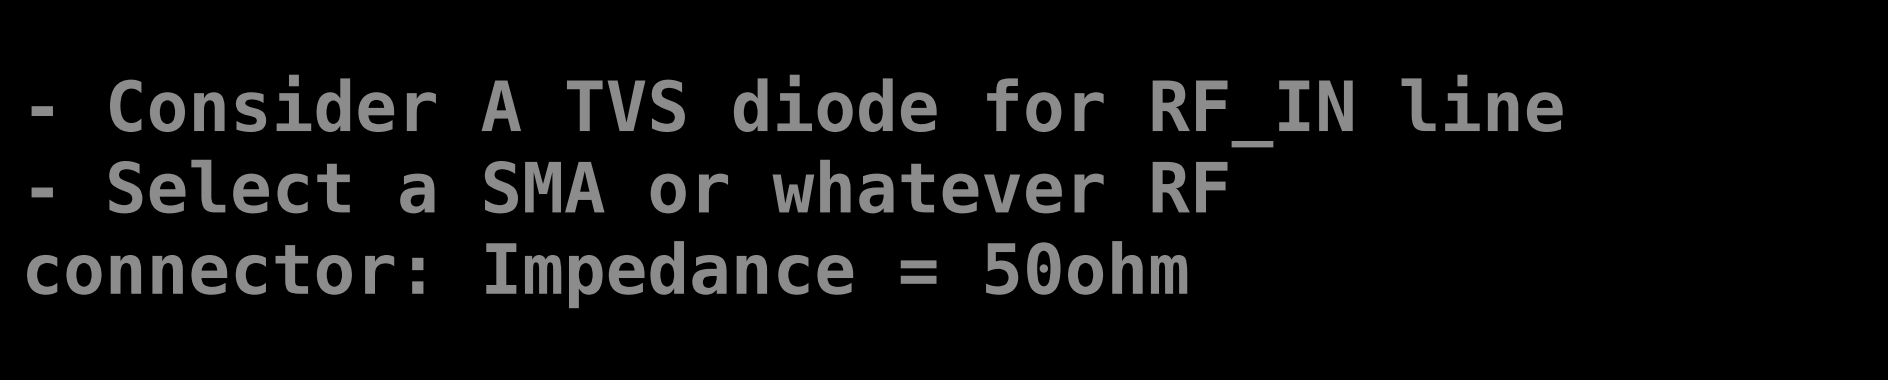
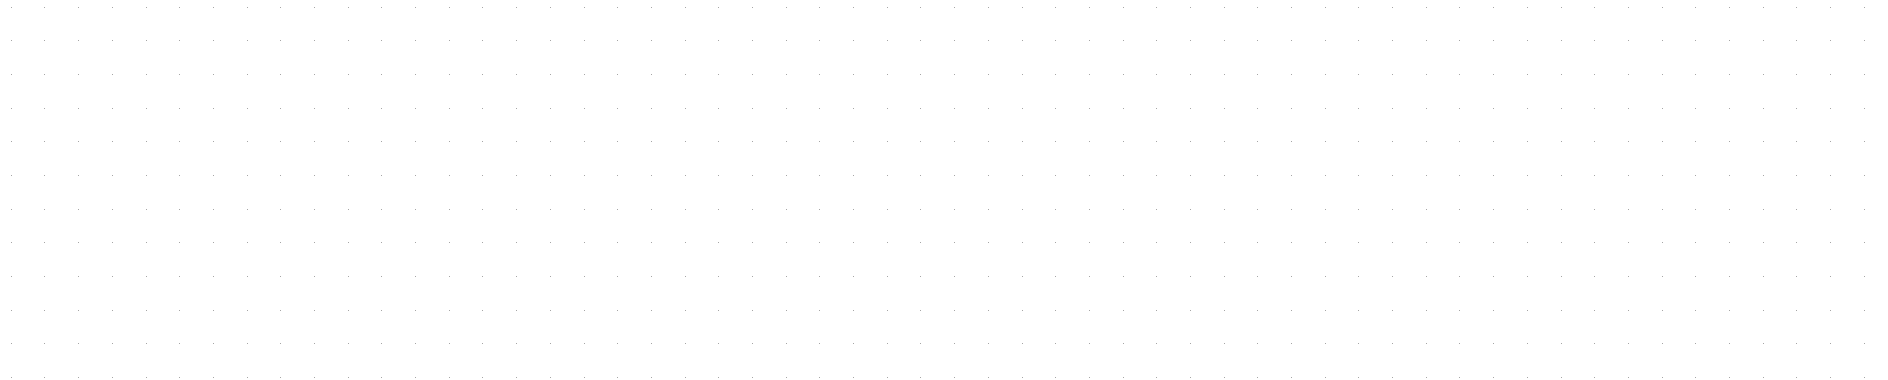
text: - Consider A TVS diode for RF_IN line (797, 111) -> none
text: - Select a SMA or whatever RF (629, 186) -> none
text: connector: Impedance = 50ohm (607, 274) -> none

